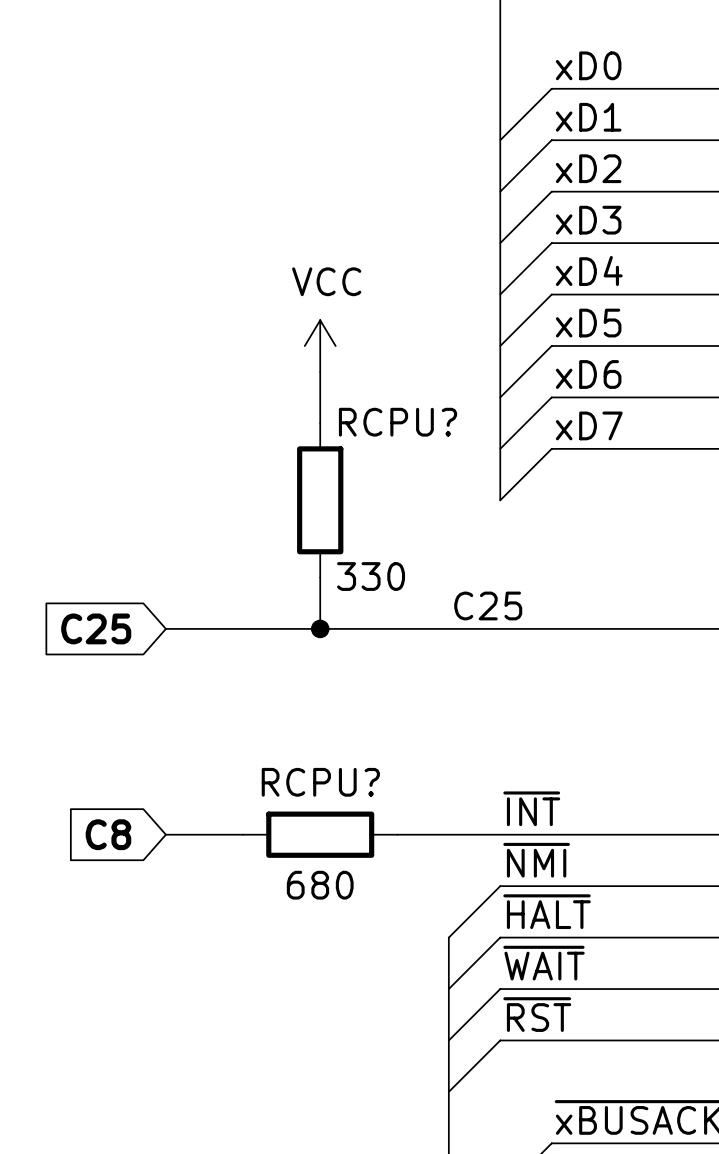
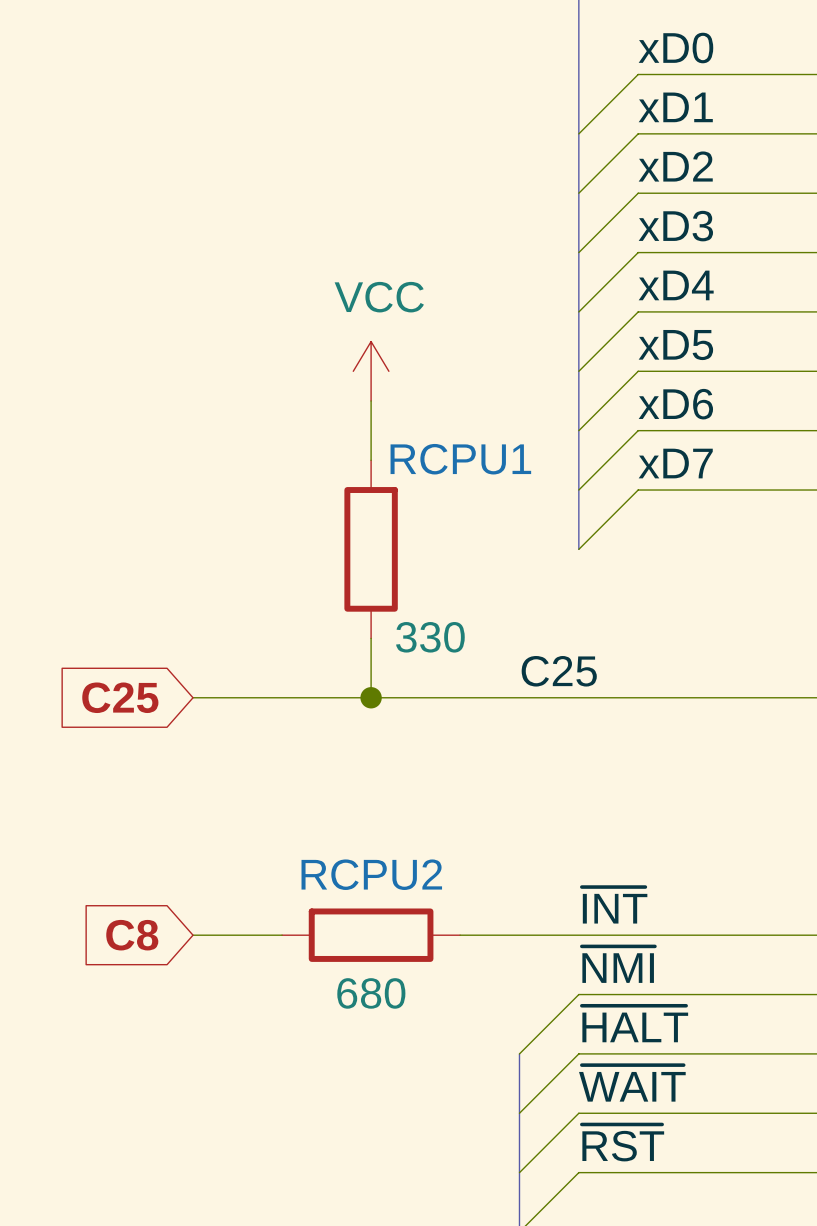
RCPU? name: RCPU? (398, 422) -> RCPU1 (460, 459)
RCPU? name: RCPU? (320, 782) -> RCPU2 (371, 874)

